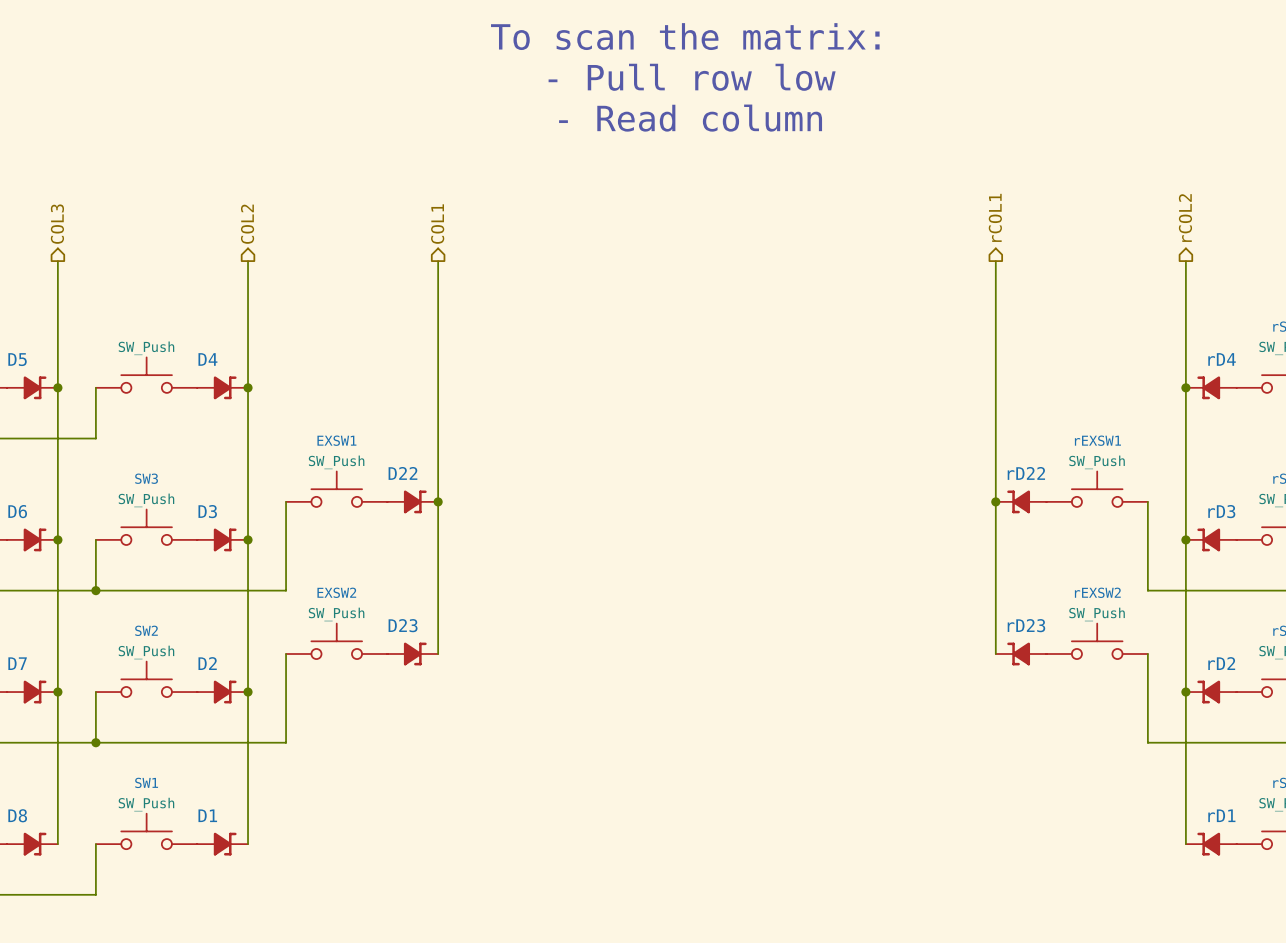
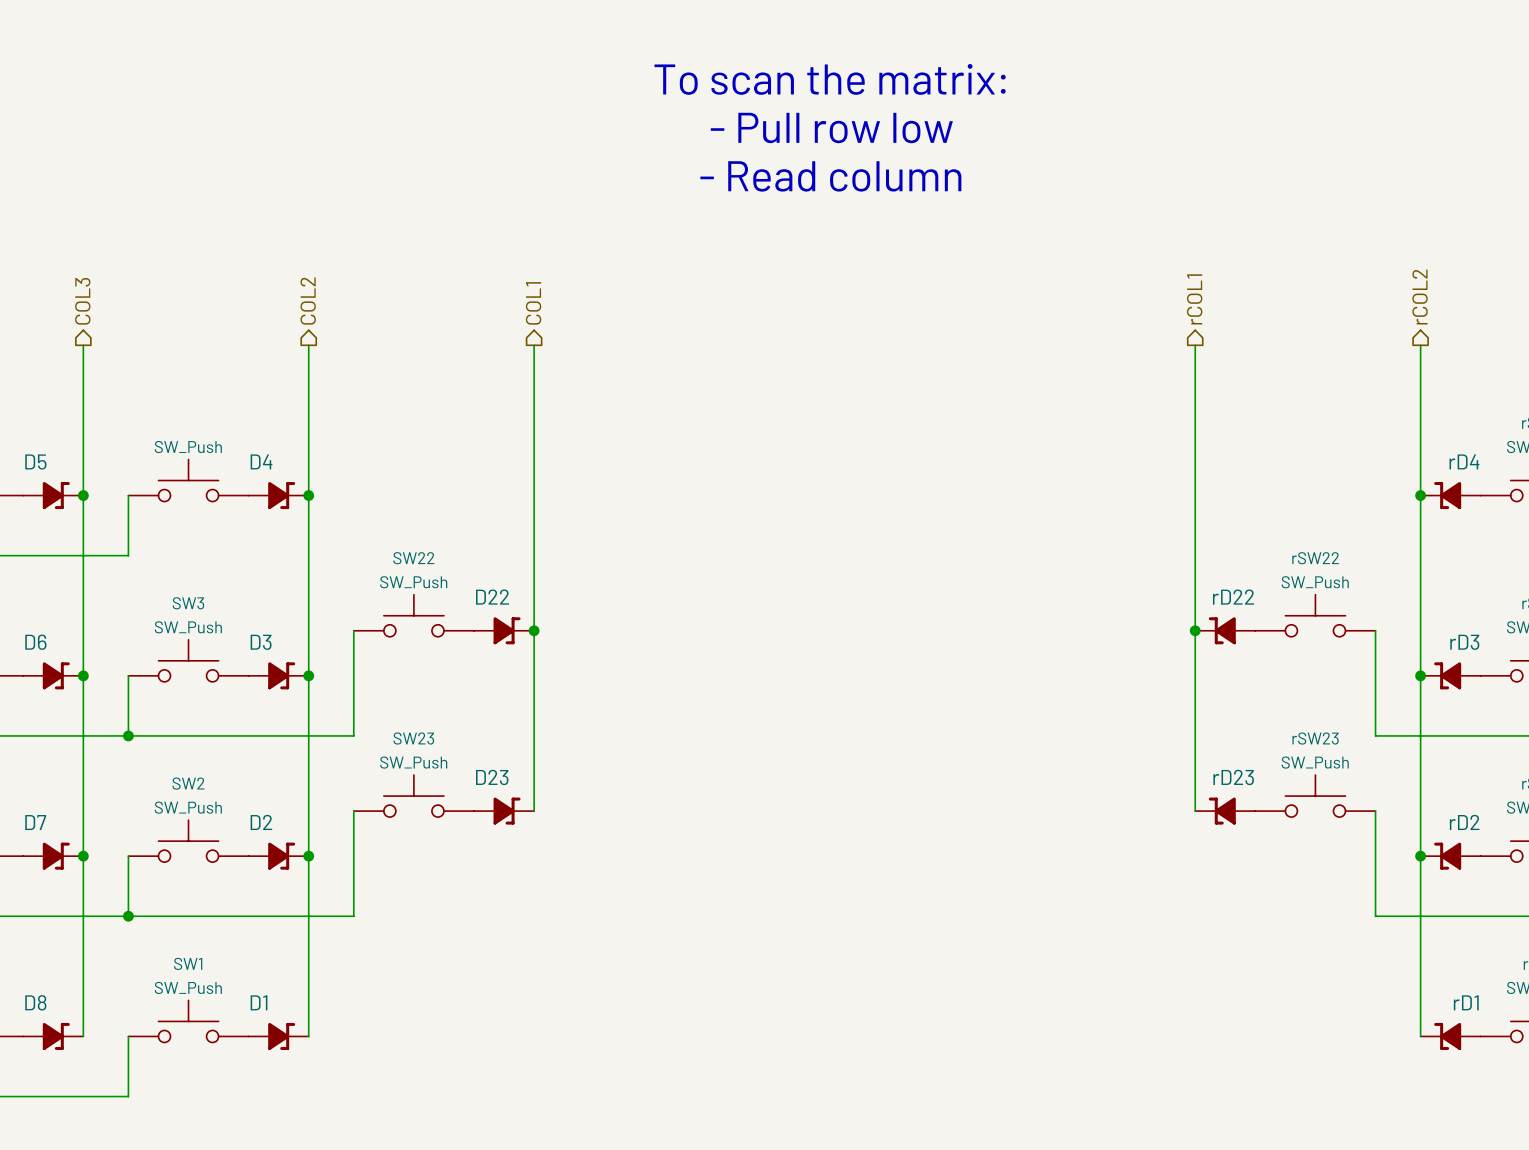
EXSW1 name: EXSW1 (336, 440) -> SW22 (413, 558)
rEXSW1 name: rEXSW1 (1097, 440) -> rSW22 (1315, 558)
EXSW2 name: EXSW2 (336, 592) -> SW23 (413, 738)
rEXSW2 name: rEXSW2 (1097, 592) -> rSW23 (1315, 738)

